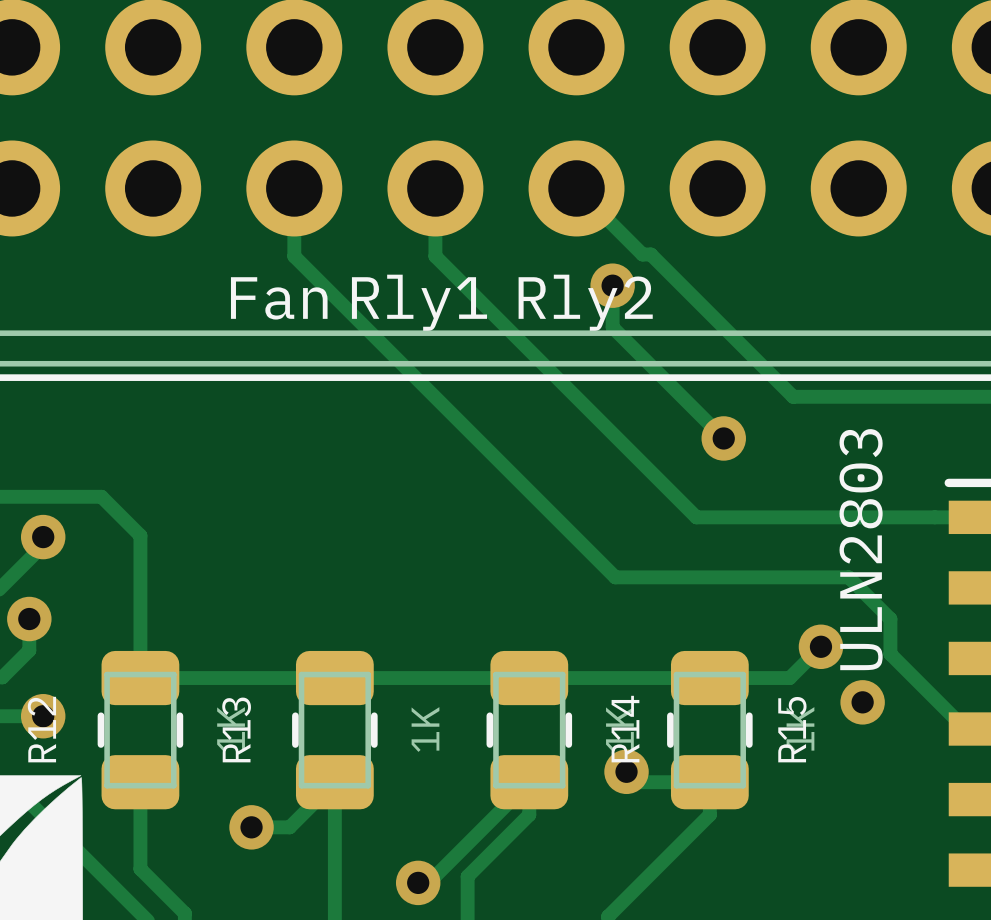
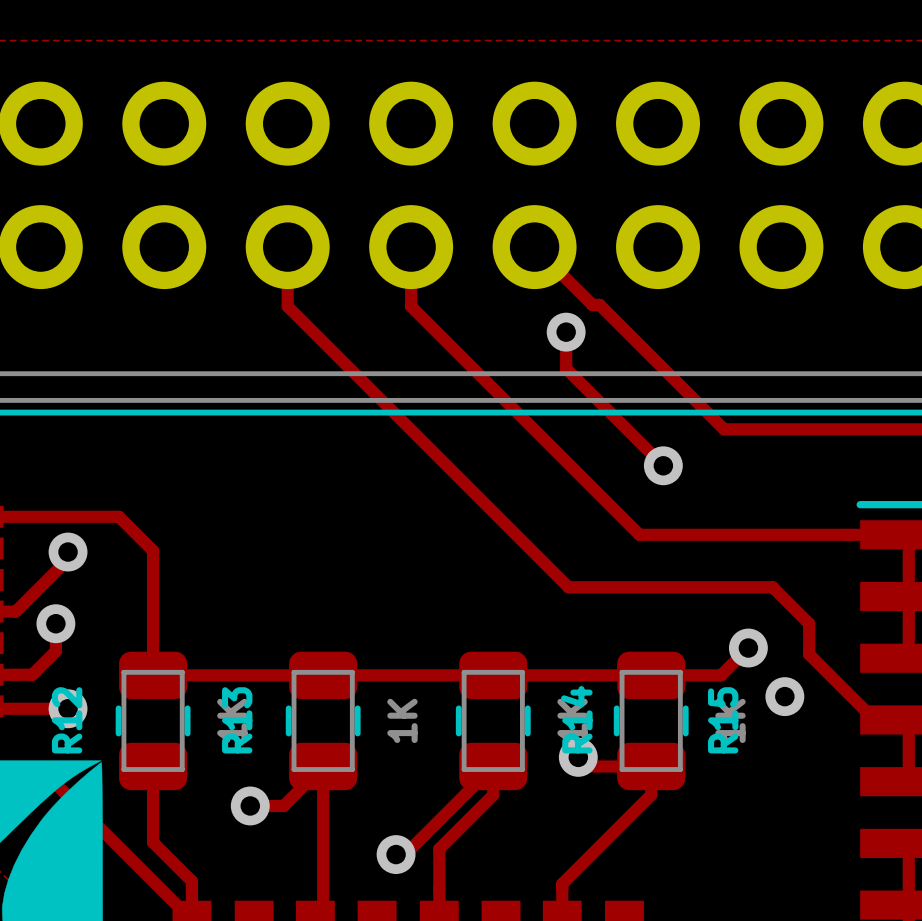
text: Fan (279, 298) -> none
text: Rly1 (419, 302) -> none
text: Rly2 (585, 302) -> none
text: ULN2803 (861, 549) -> none

